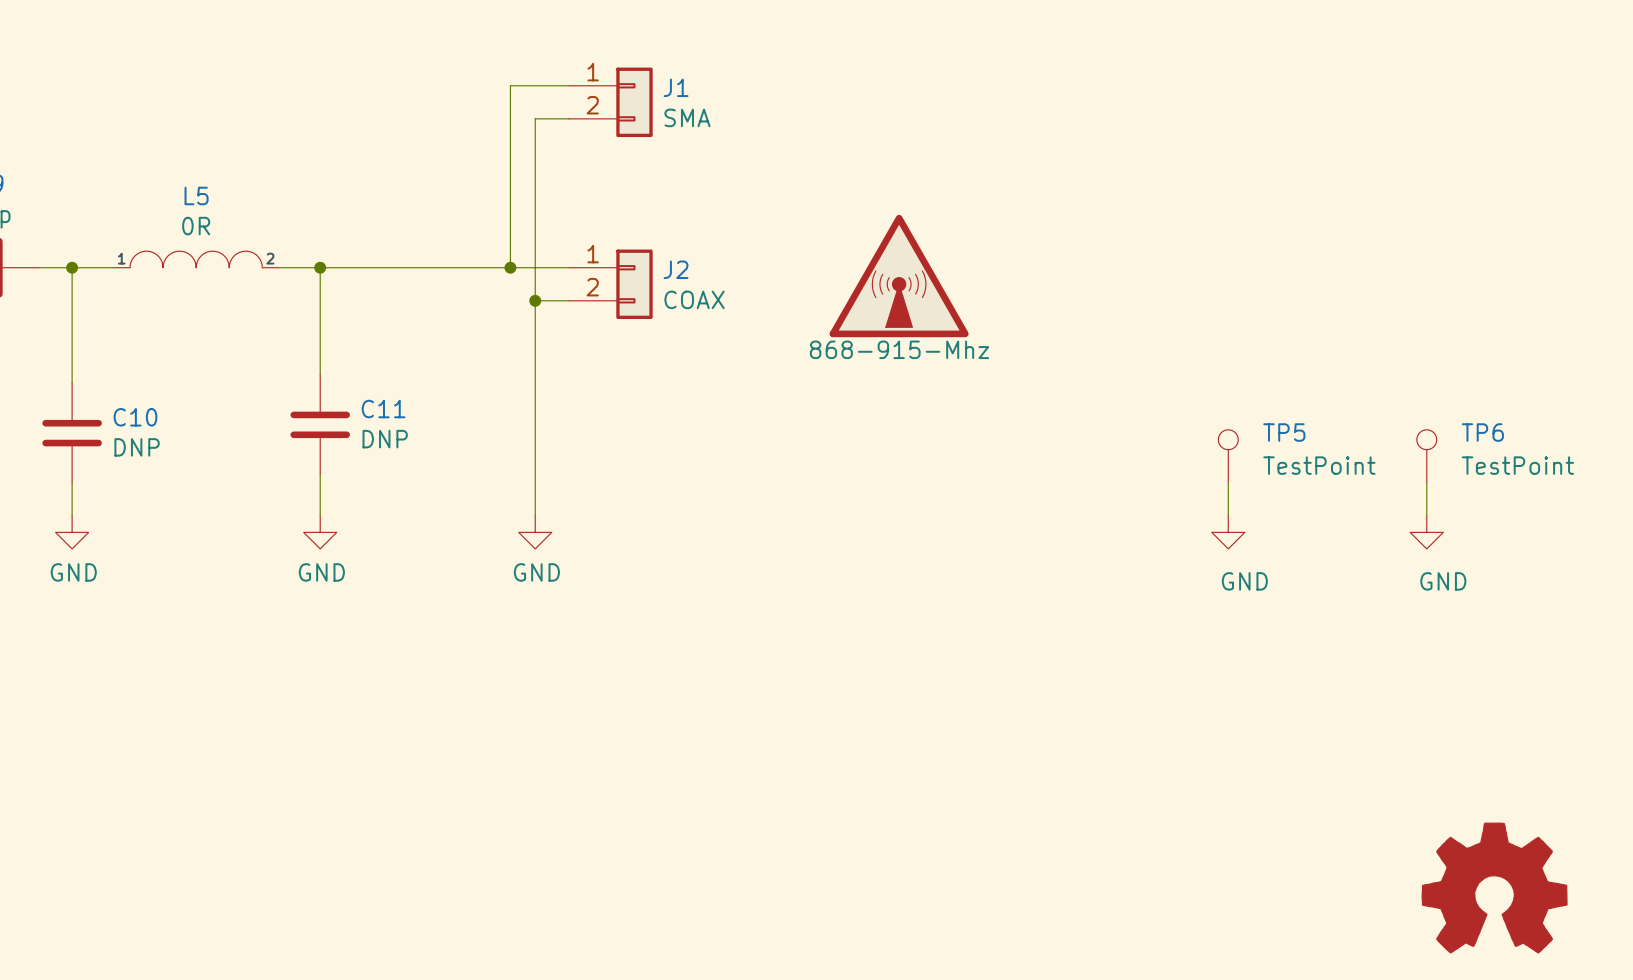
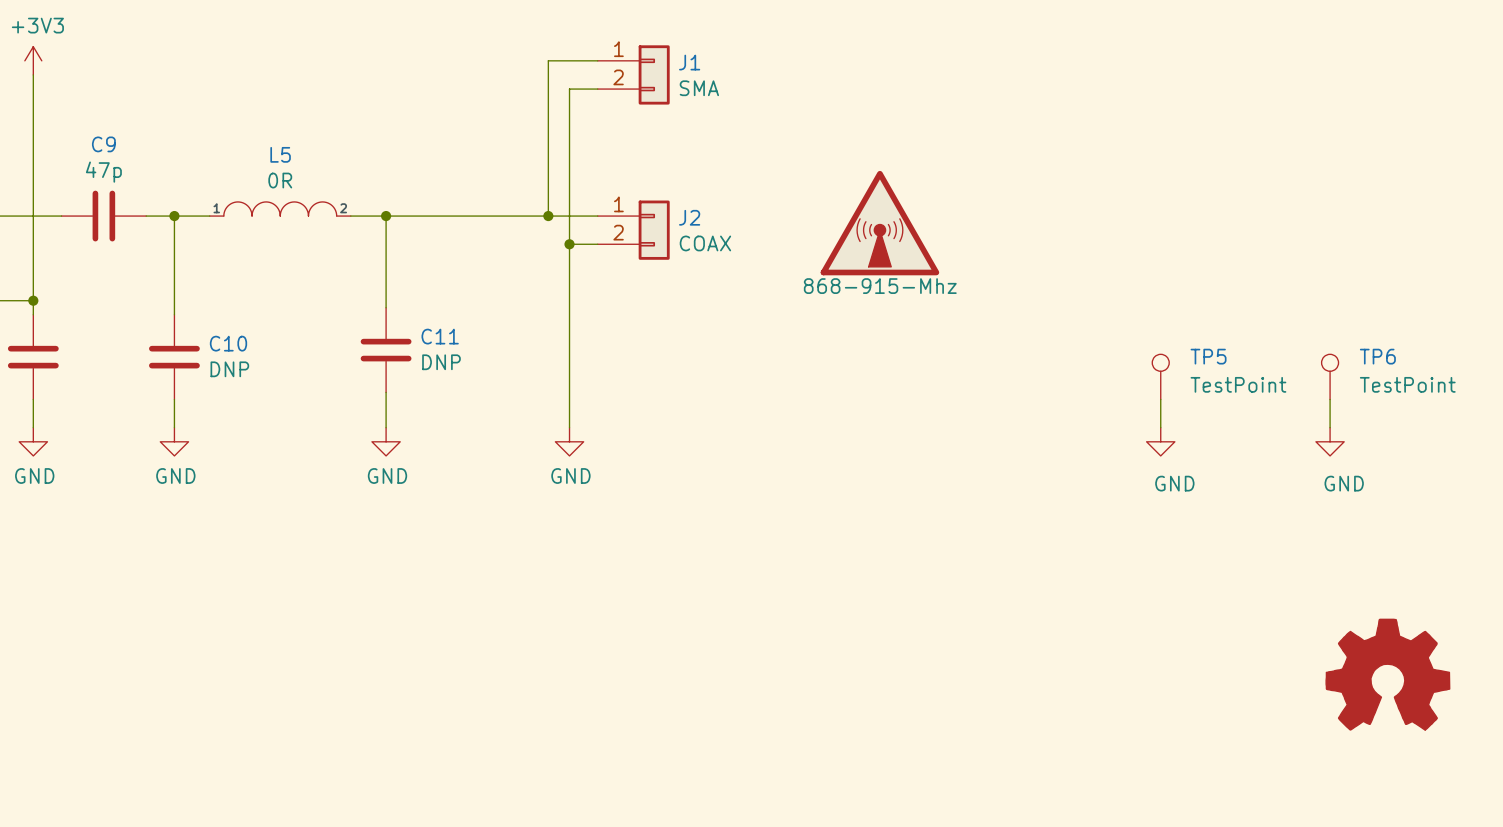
part position: (1494, 887) -> (1387, 674)

